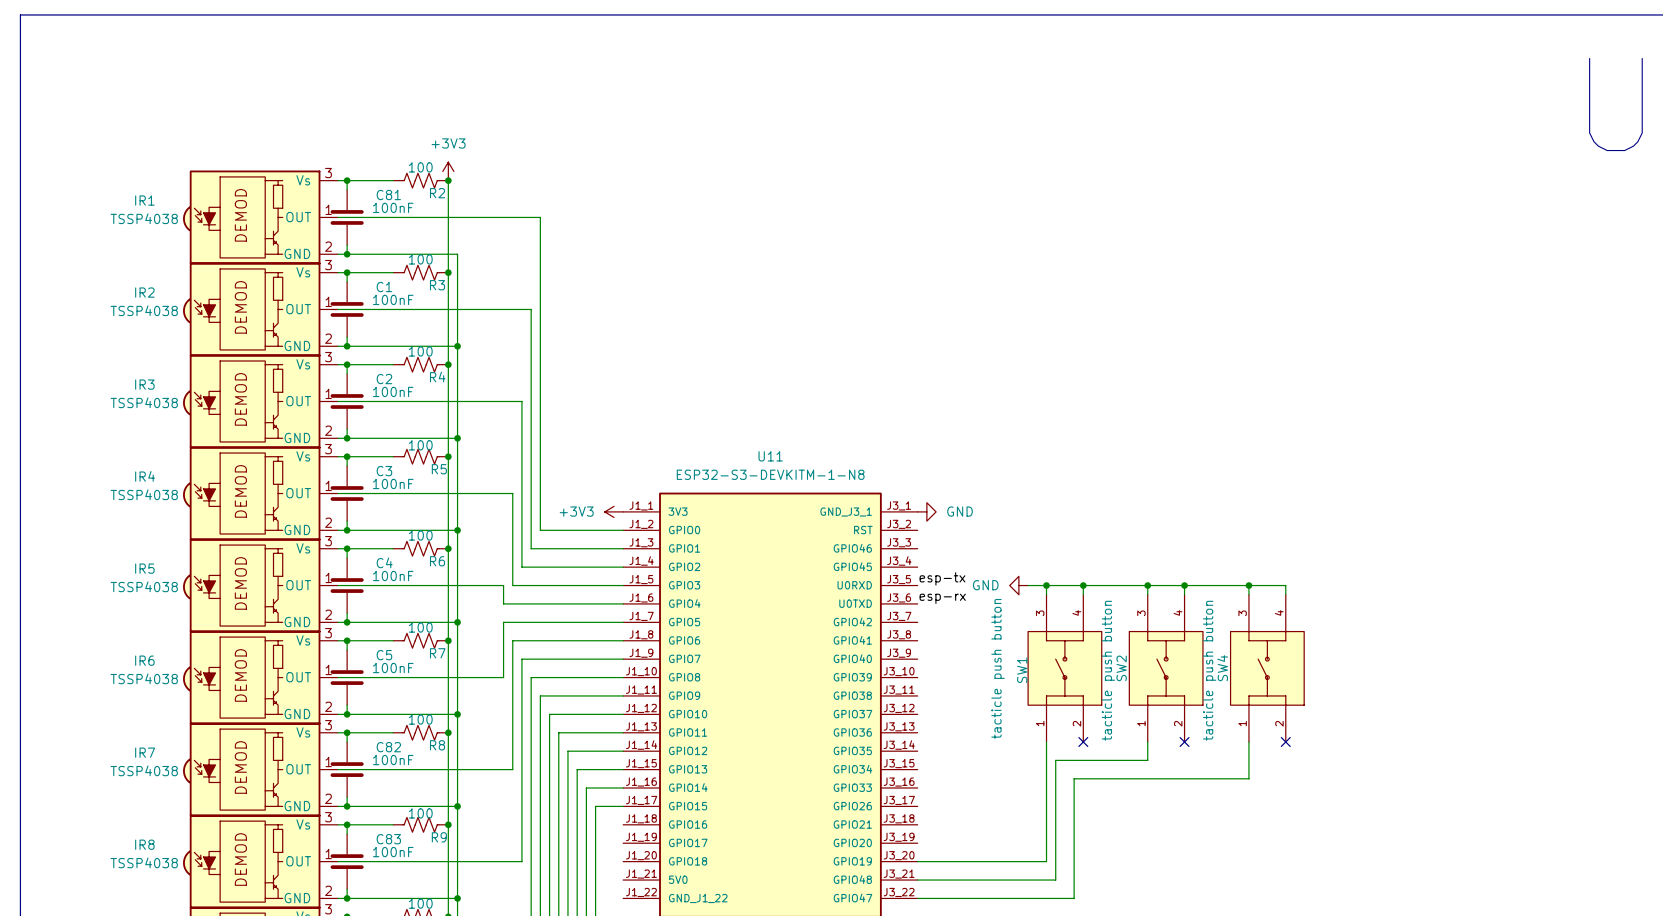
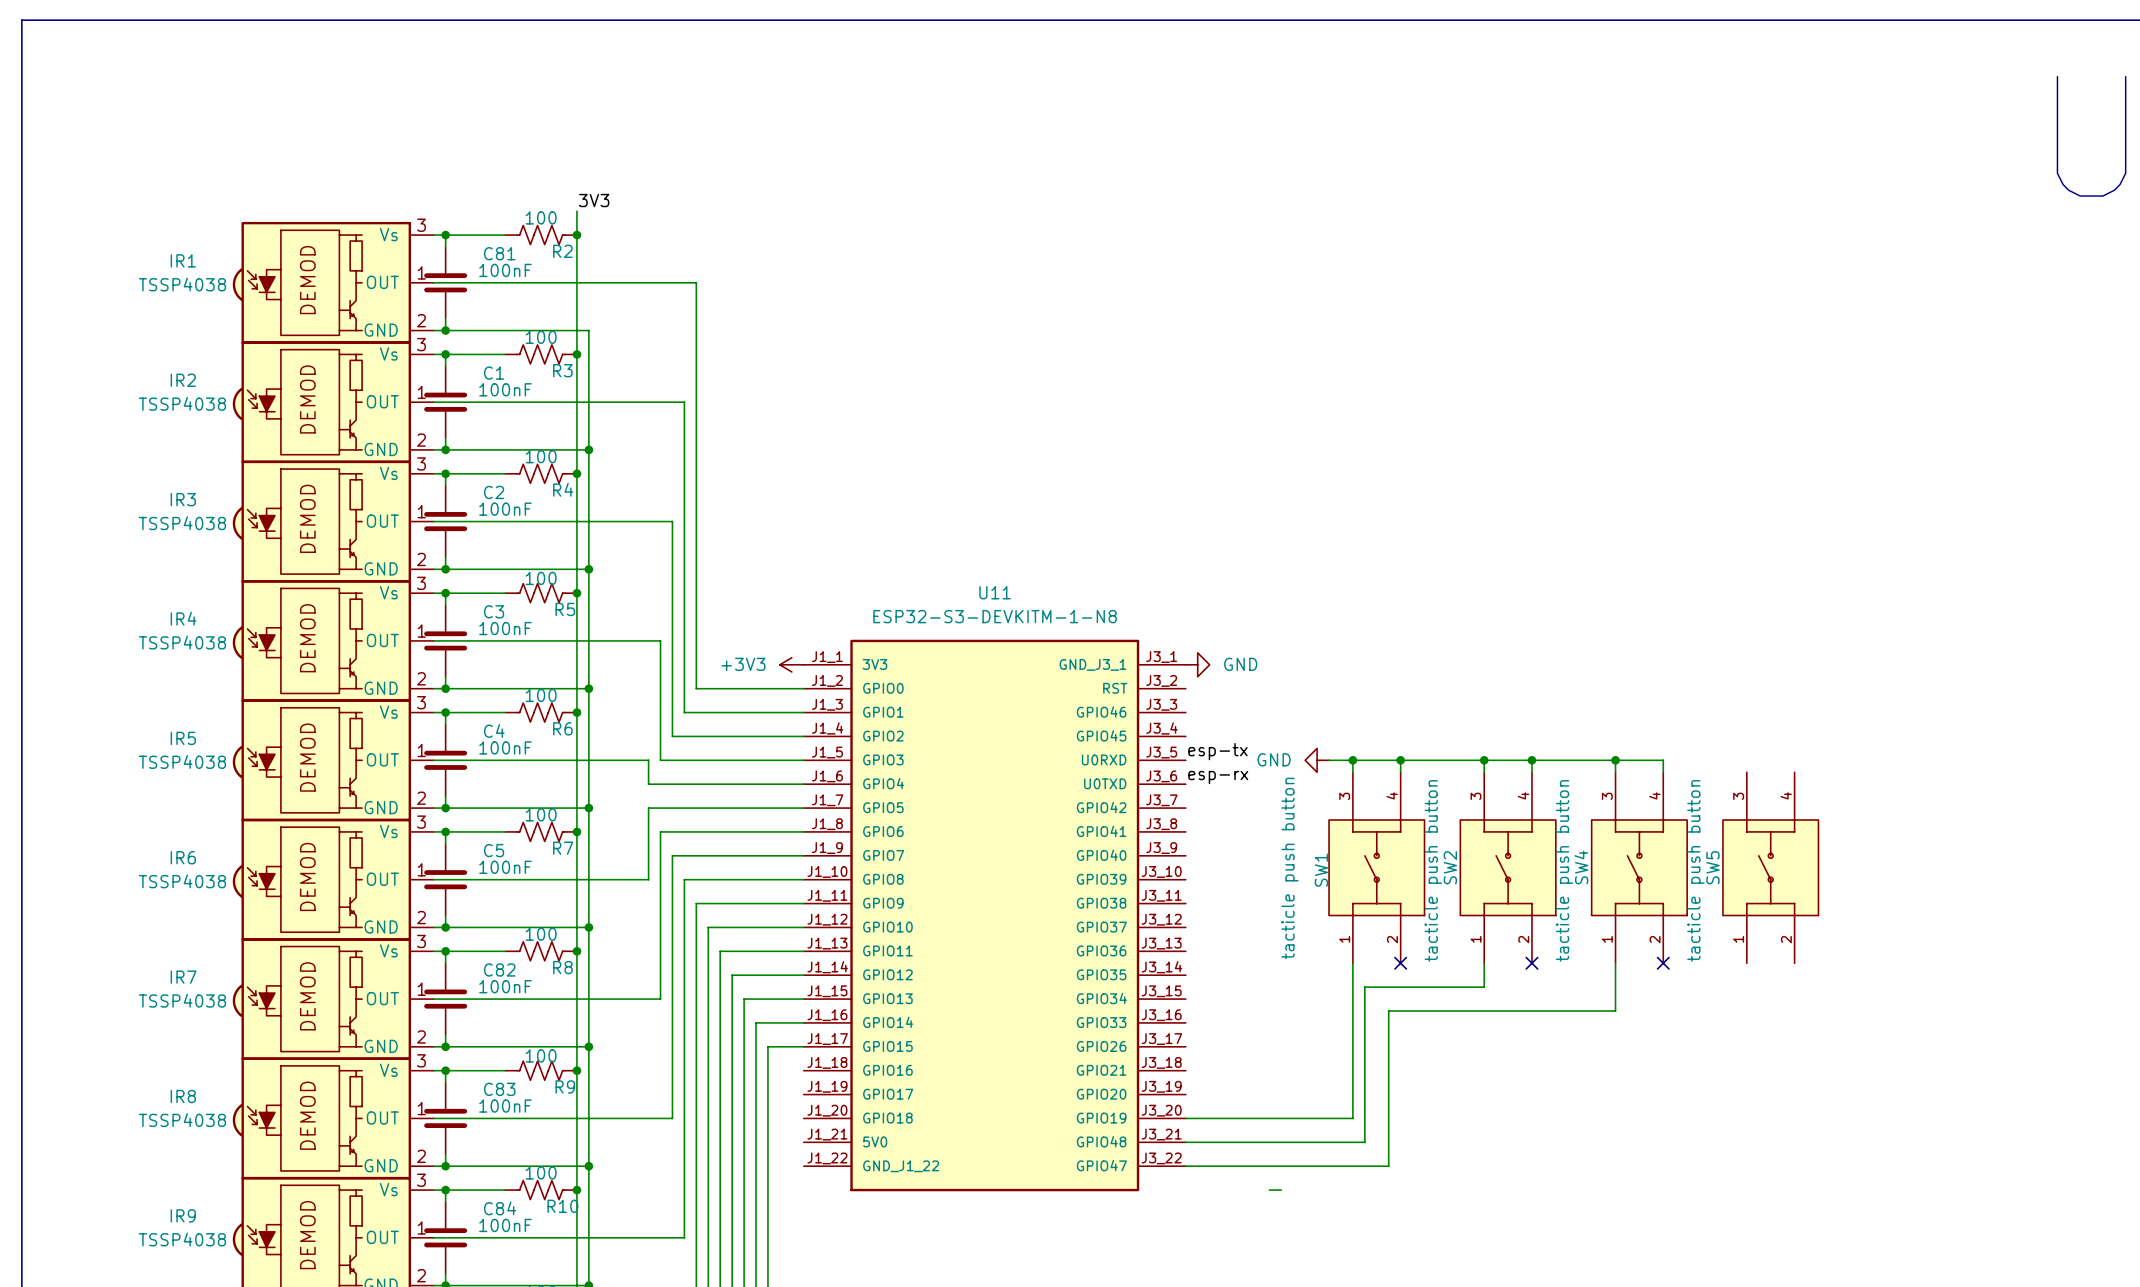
label: none -> 3V3 (594, 200)
power symbol: +3V3 (448, 171) -> none
SW5: none -> tacticle push button (1770, 867)

